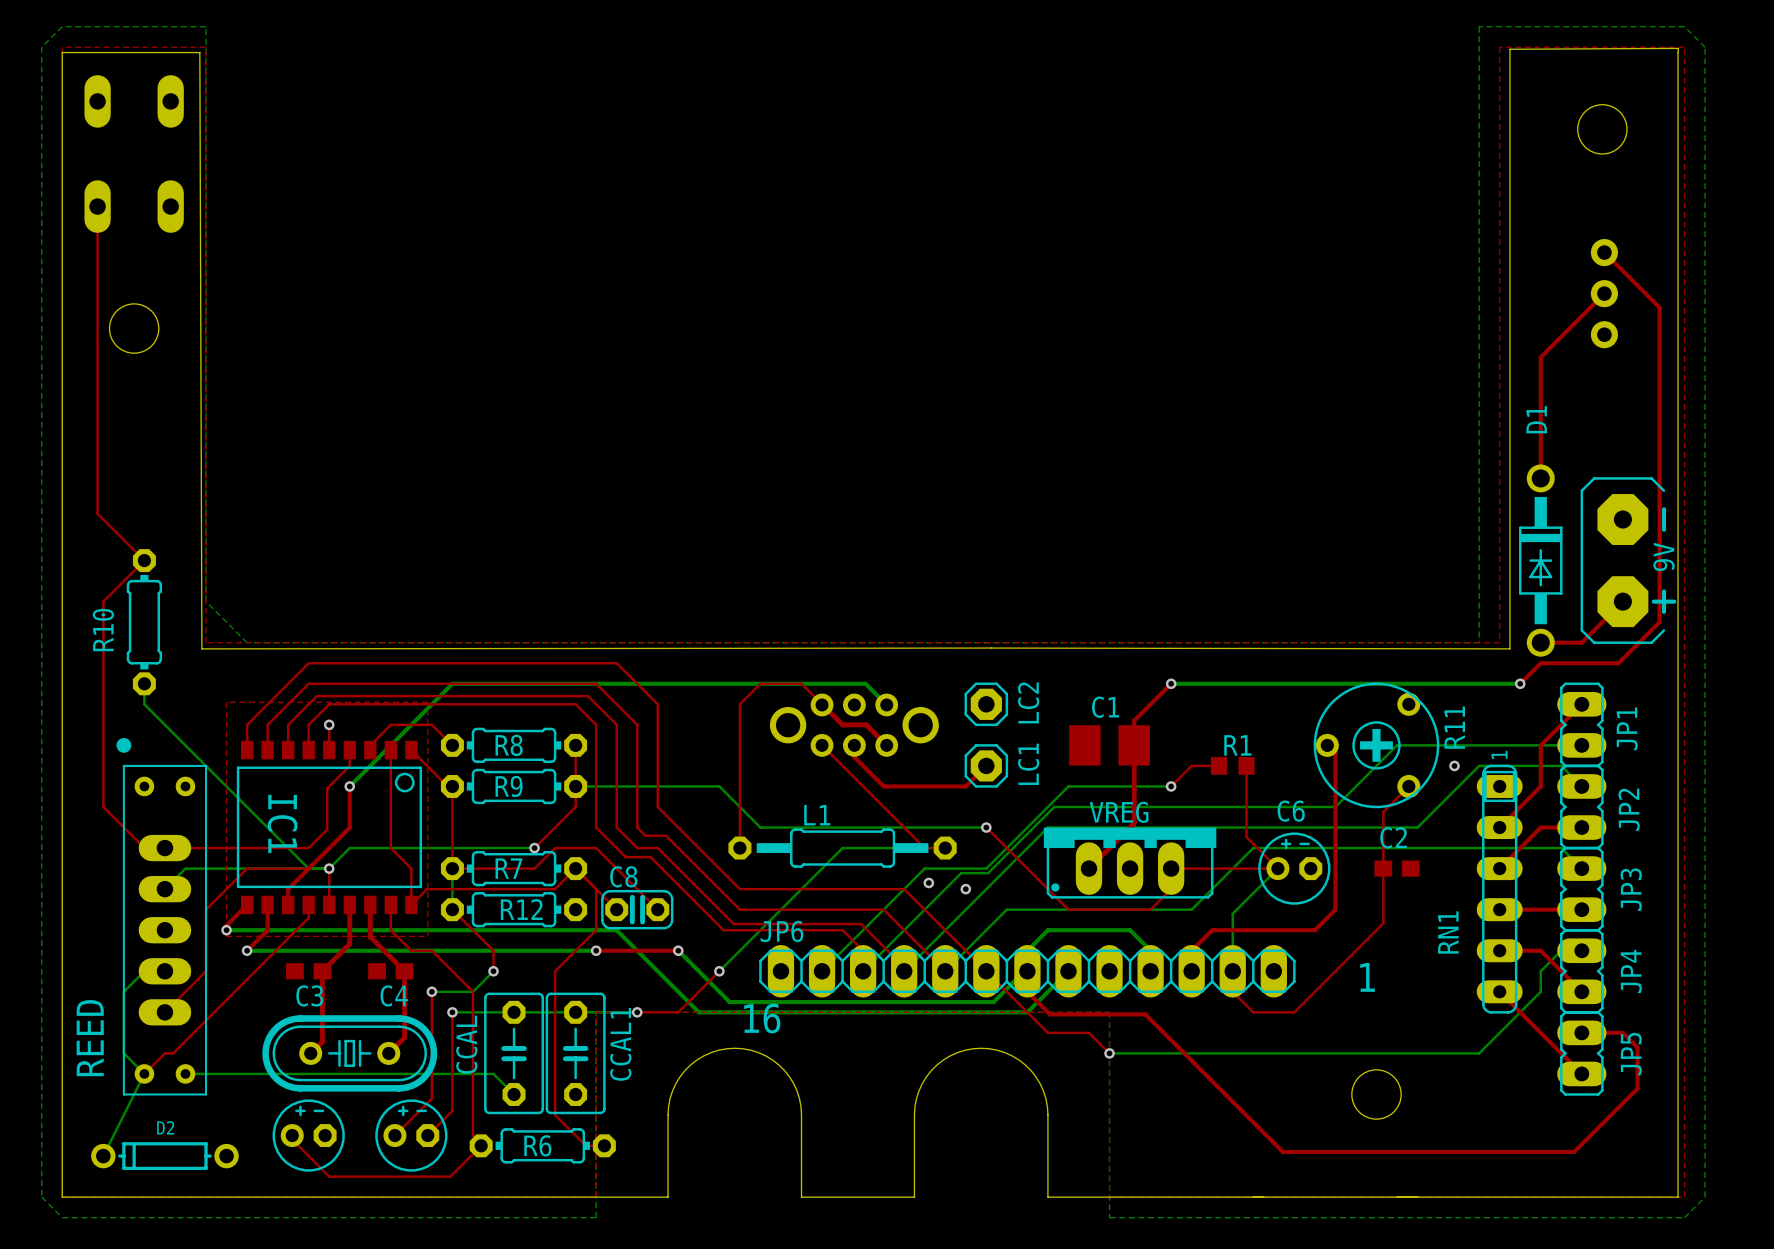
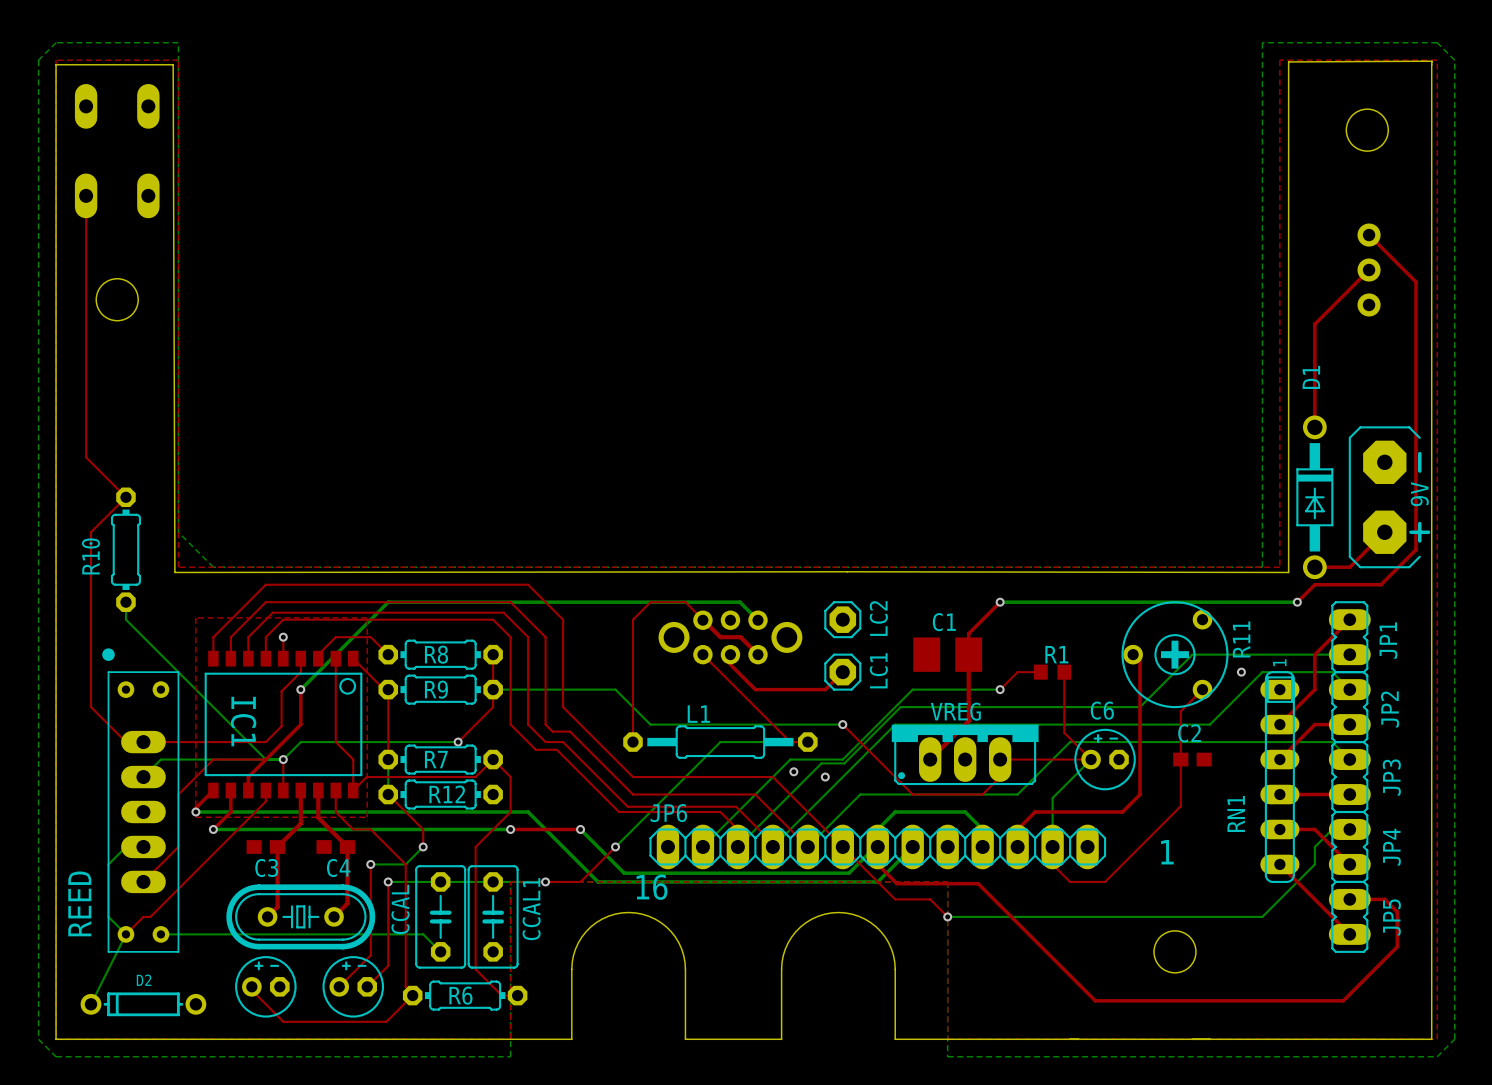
top track: (452, 868) (534, 868) (555, 848) (596, 848) (657, 909) -> none
top track: (596, 889) (616, 909) -> none
C8: (637, 909) -> none

